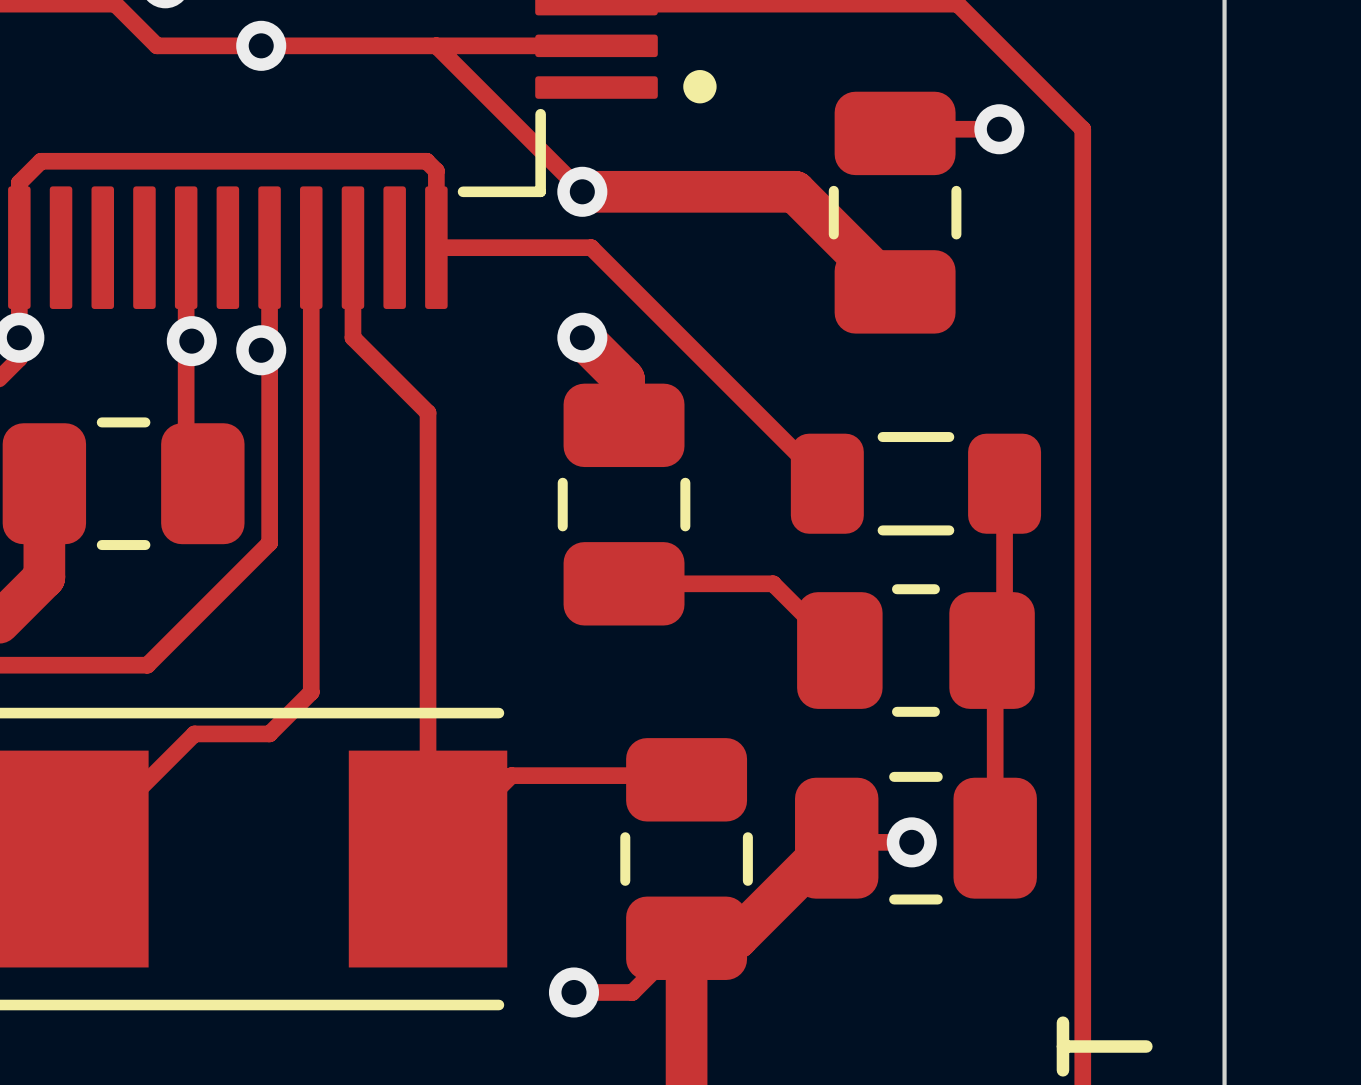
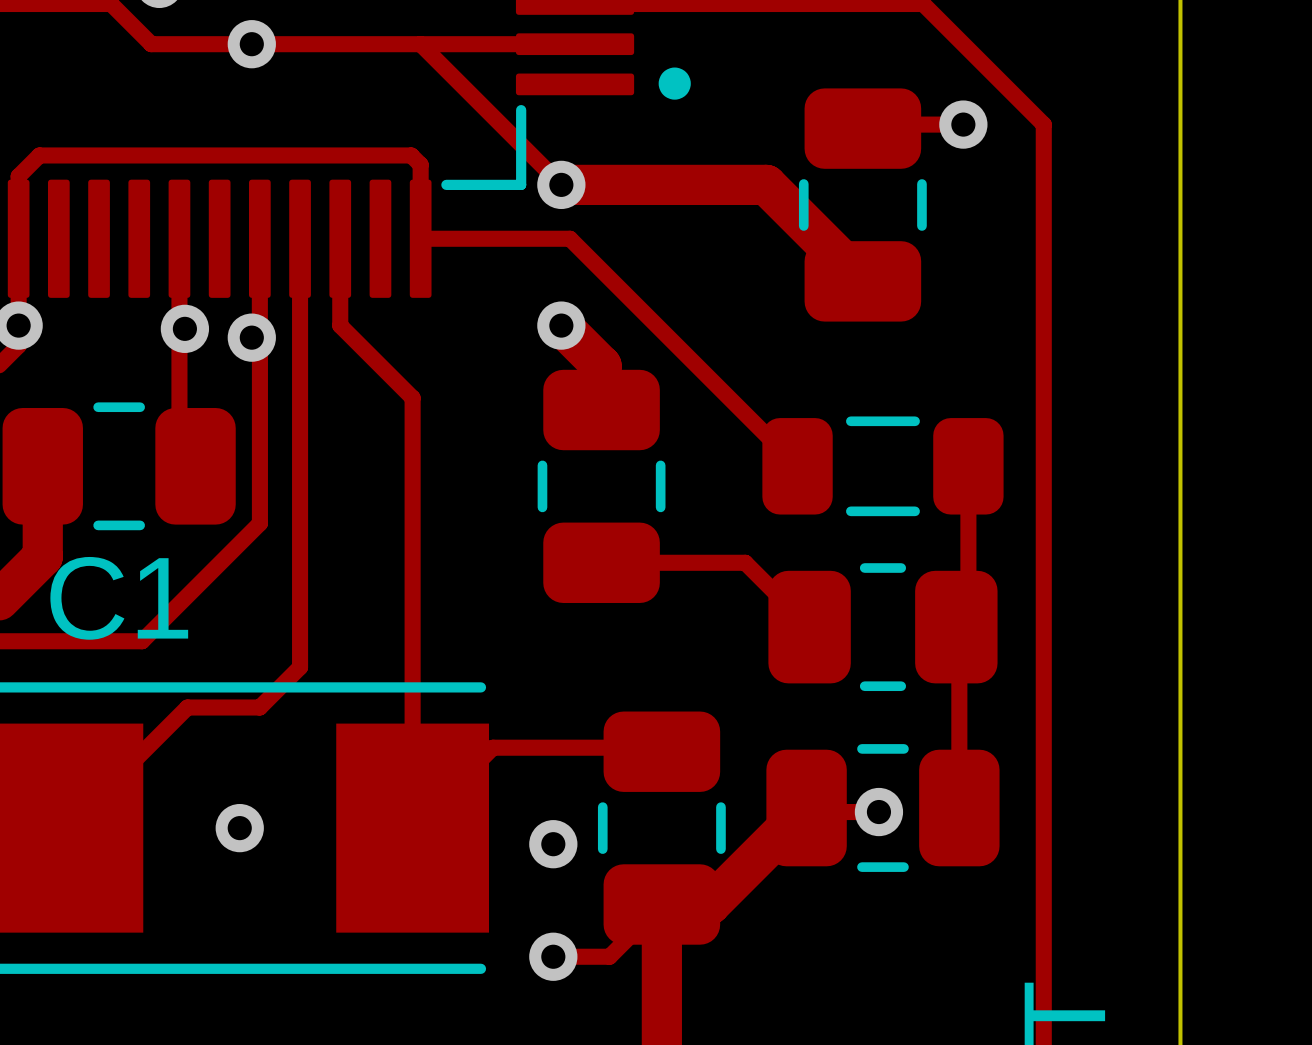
C1 name: none -> C1 (119, 598)
via: none -> (239, 828)
via: none -> (553, 844)

